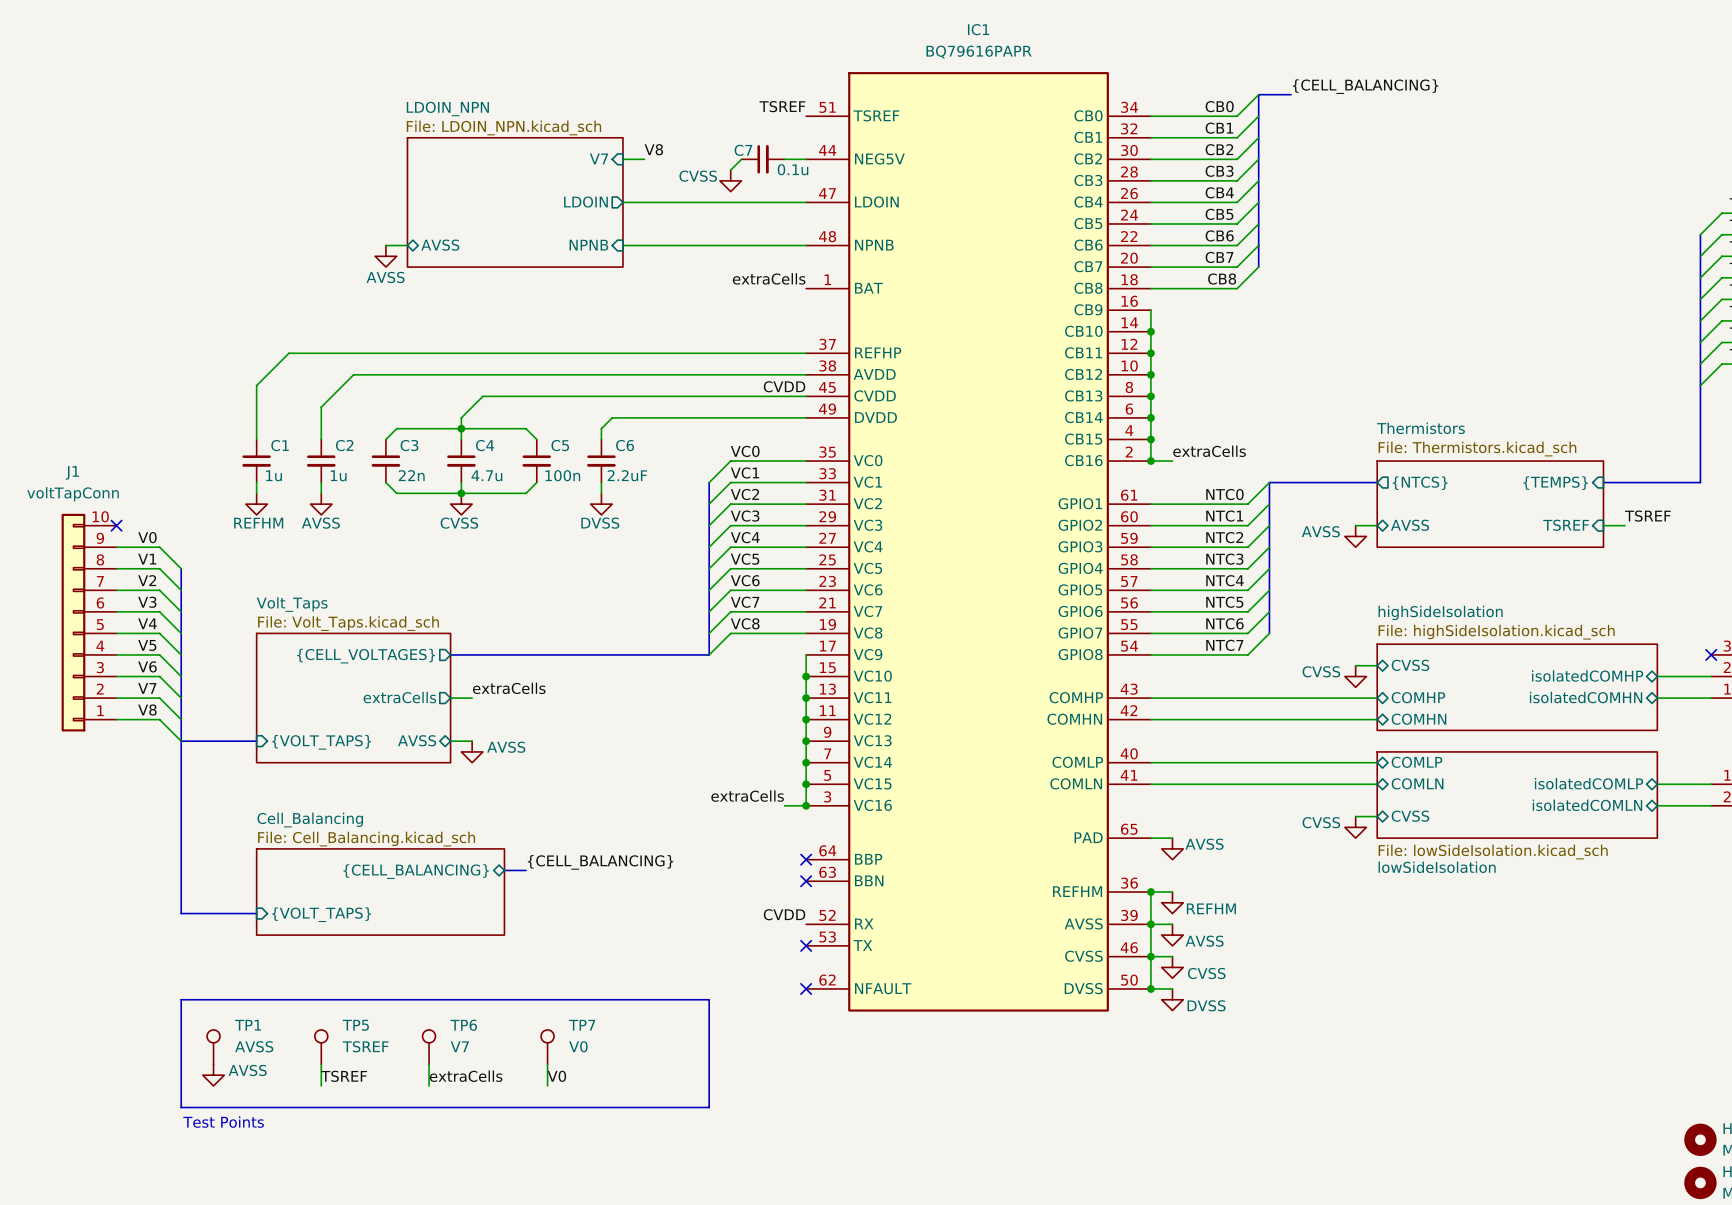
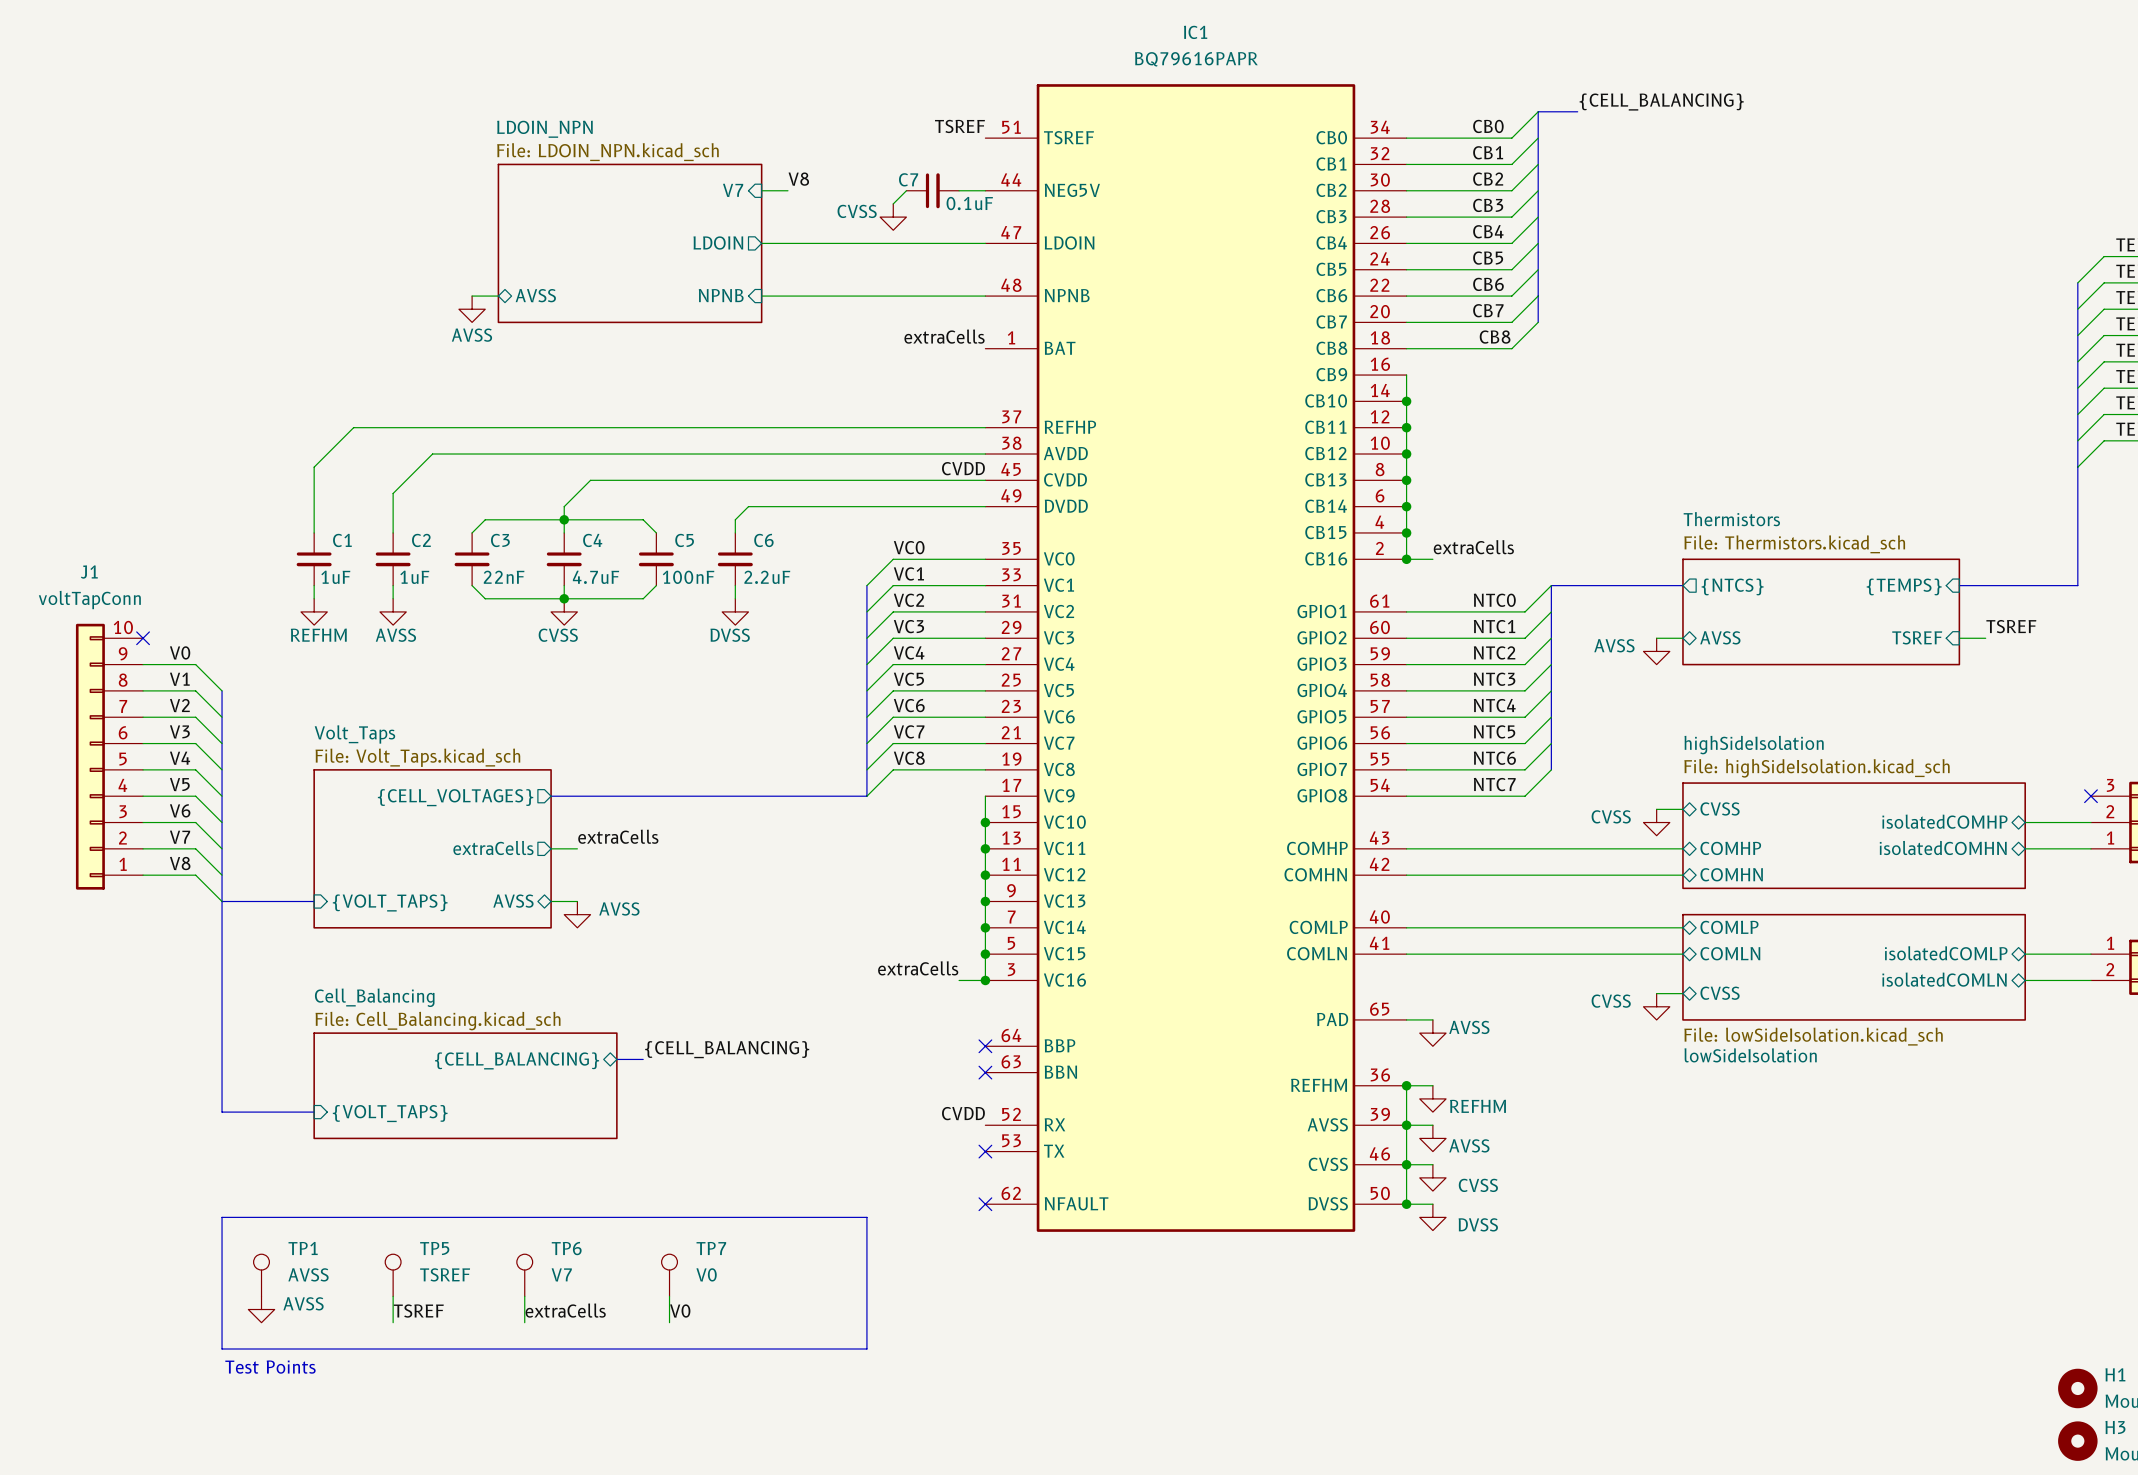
C7 value: 0.1u (793, 169) -> 0.1uF (969, 203)
C1 value: 1u (274, 475) -> 1uF (335, 577)
C2 value: 1u (338, 475) -> 1uF (414, 577)
C3 value: 22n (411, 475) -> 22nF (504, 577)
C4 value: 4.7u (486, 475) -> 4.7uF (596, 577)
C5 value: 100n (562, 475) -> 100nF (688, 577)

